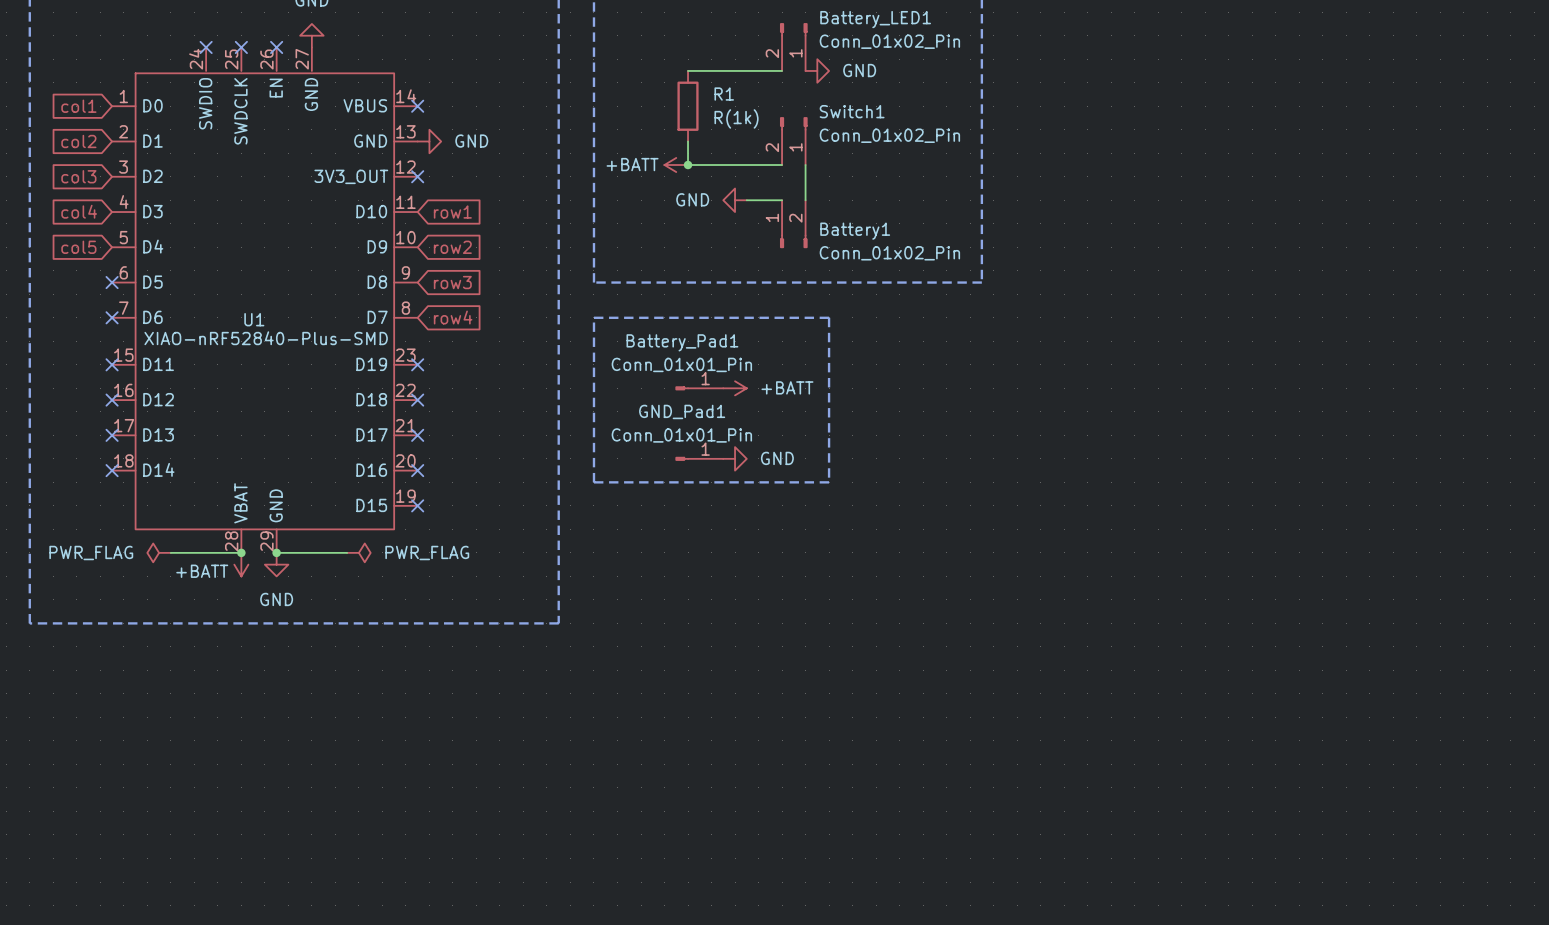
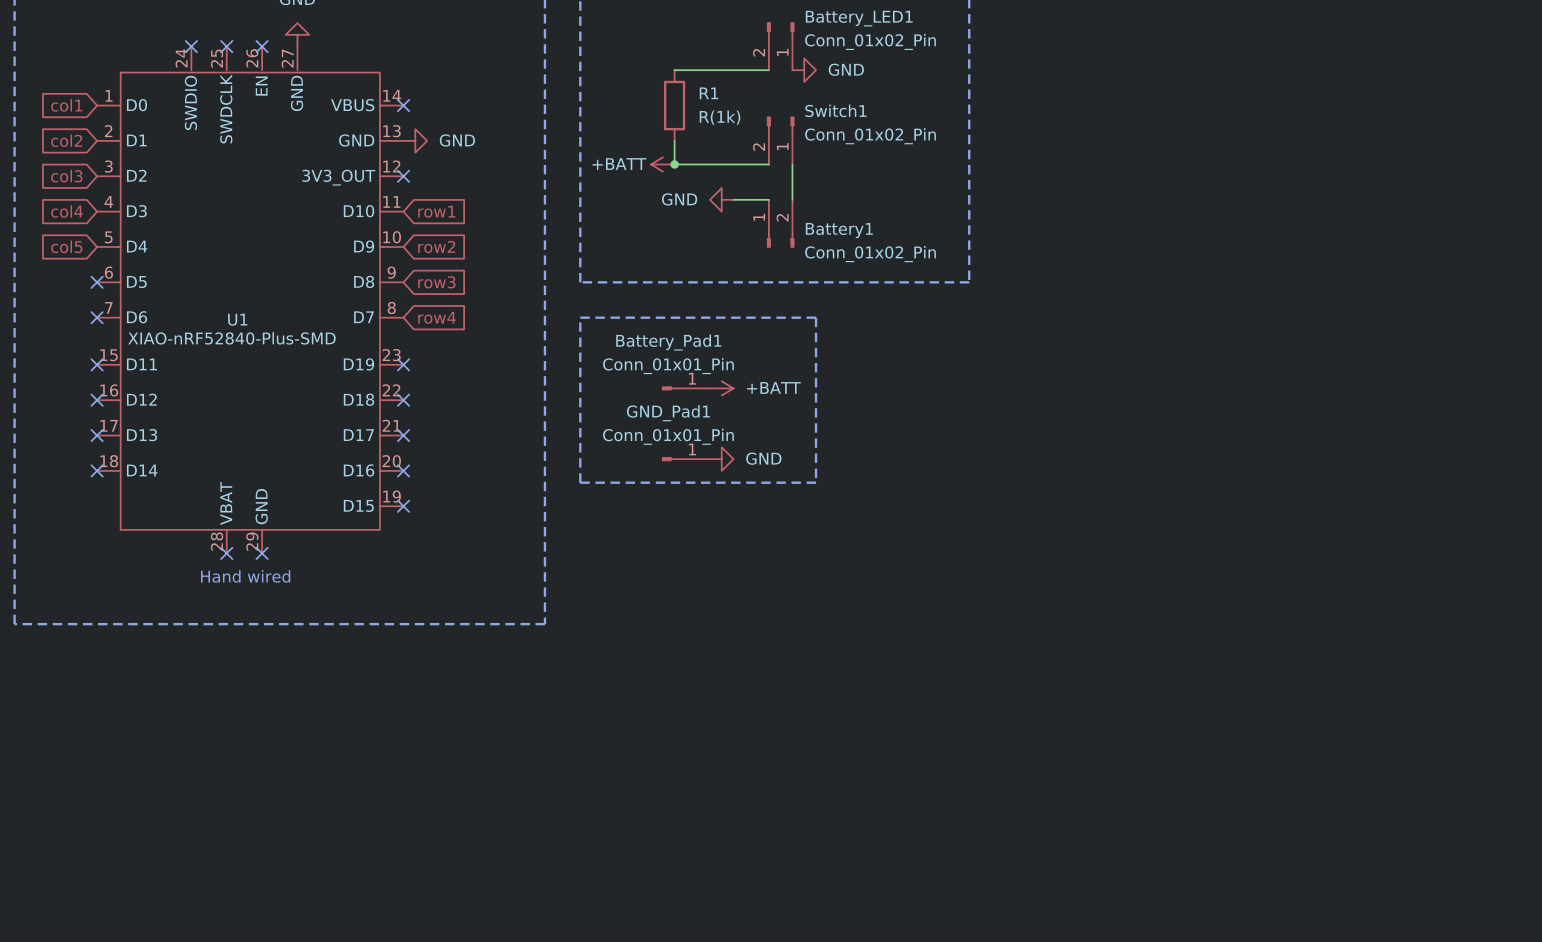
power symbol: PWR_FLAG (159, 552) -> none
wire: (170, 552) (241, 552) -> none
junction: (241, 552) -> none
no-connect mark: none -> (226, 553)
wire: (276, 552) (347, 552) -> none
junction: (276, 552) -> none
no-connect mark: none -> (262, 553)
power symbol: PWR_FLAG (358, 552) -> none
power symbol: +BATT (241, 564) -> none
power symbol: GND (276, 564) -> none
text: none -> Hand wired (245, 576)

